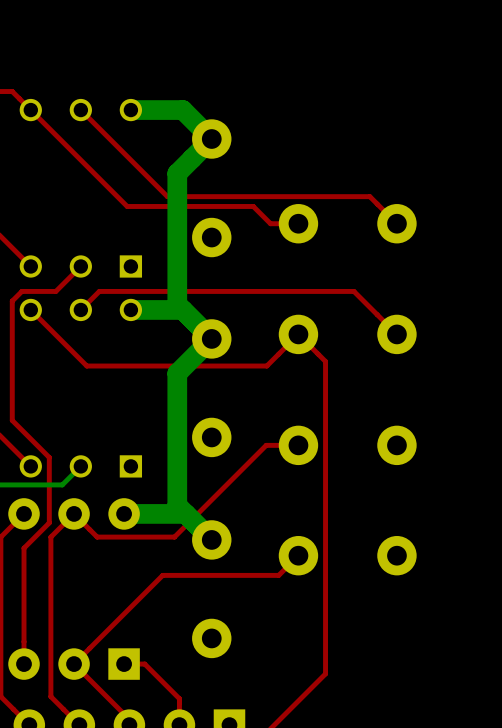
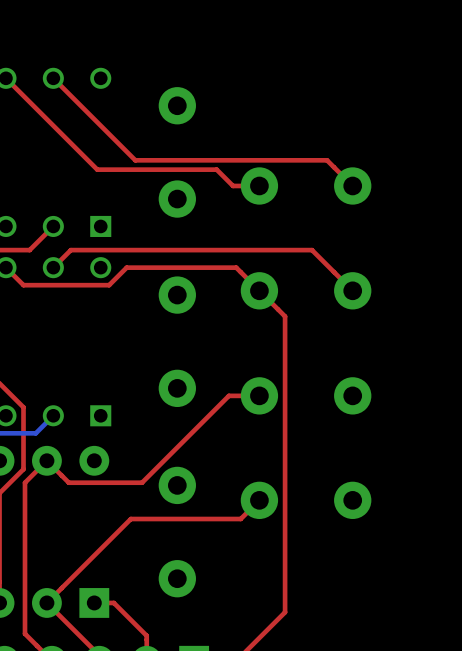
bottom track: (130, 110) (182, 110) (211, 139) (177, 173) (177, 304) (211, 338) (177, 373) (177, 505) (211, 539) -> none
bottom track: (182, 309) (130, 309) -> none
top track: (49, 328) (86, 366) (266, 366) (298, 334) -> (23, 285) (109, 285) (126, 267) (236, 267) (259, 290)
bottom track: (185, 513) (124, 513) -> none

